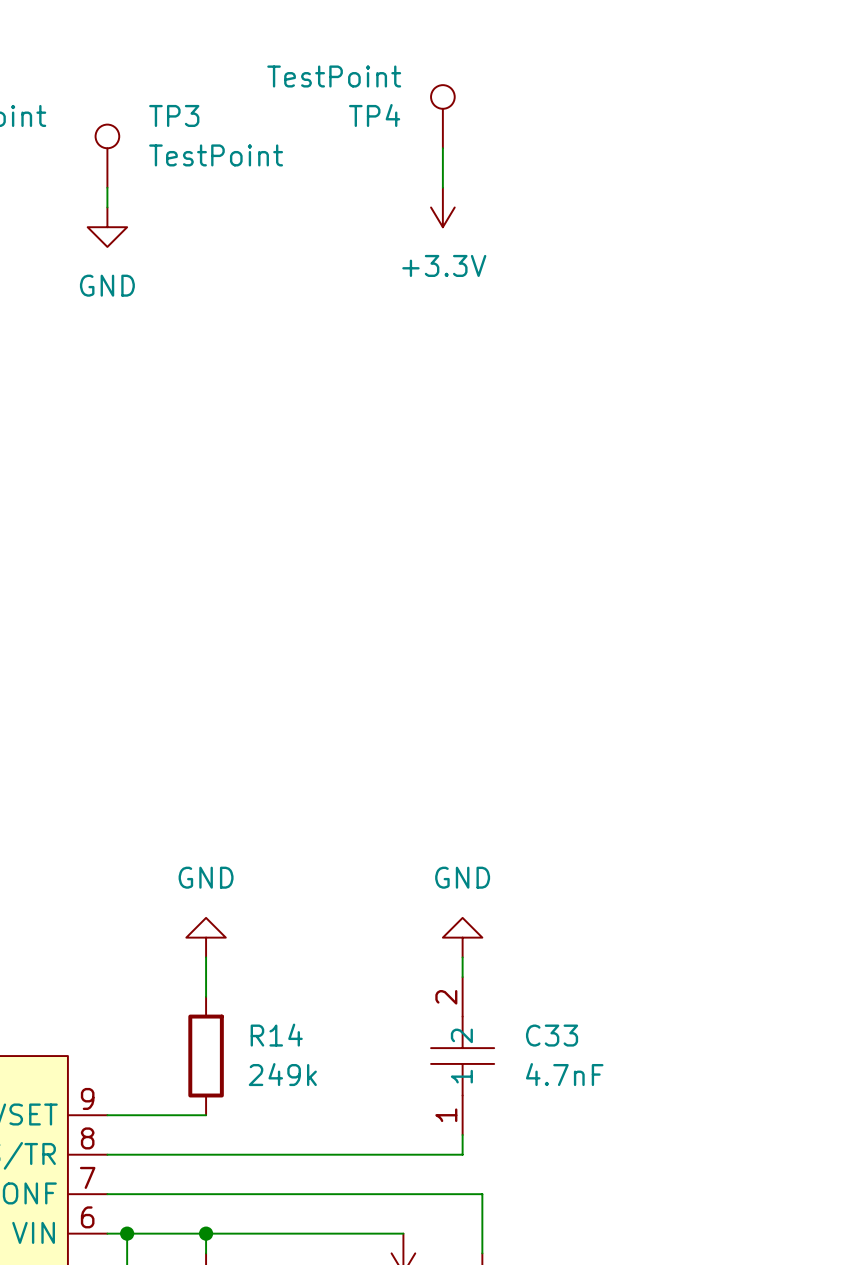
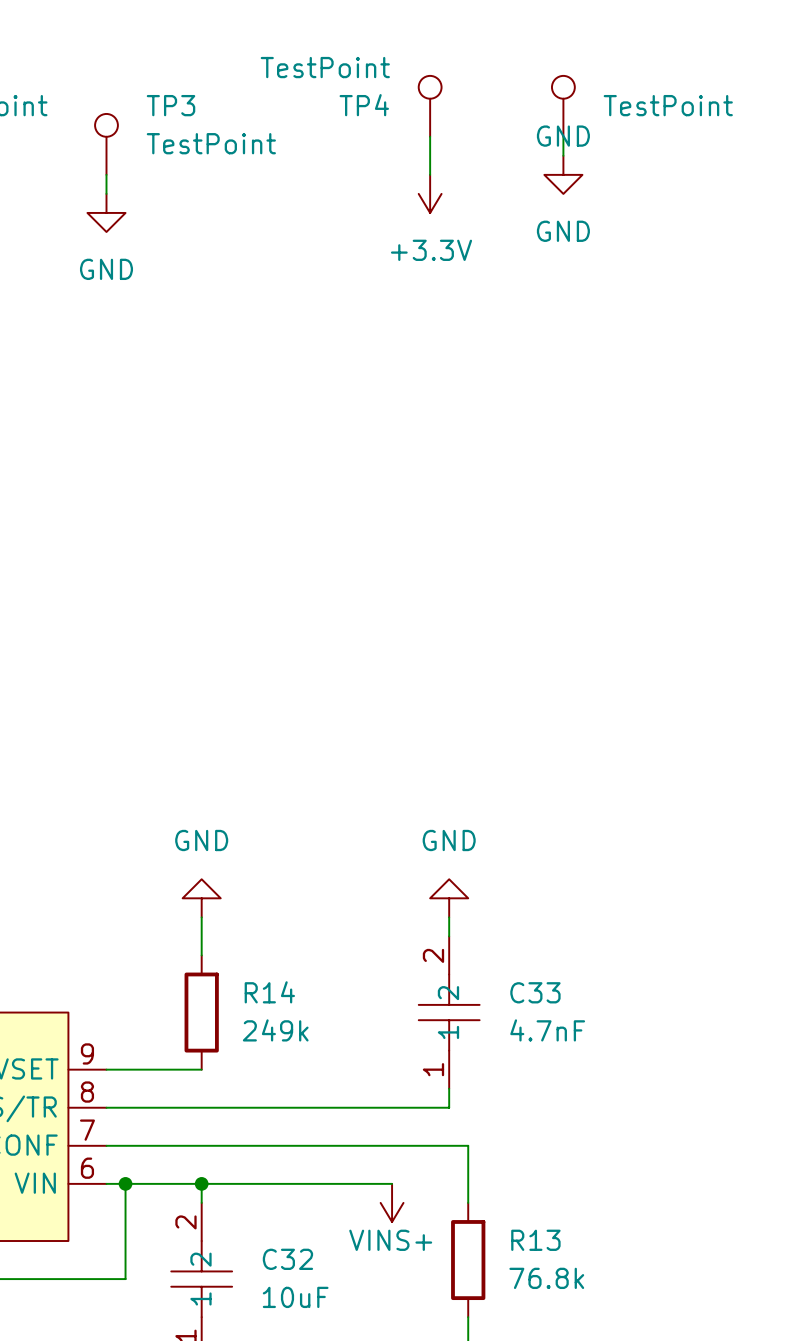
part: none -> TestPoint (563, 106)
wire: none -> (563, 136) (563, 155)
power symbol: none -> GND (563, 174)

